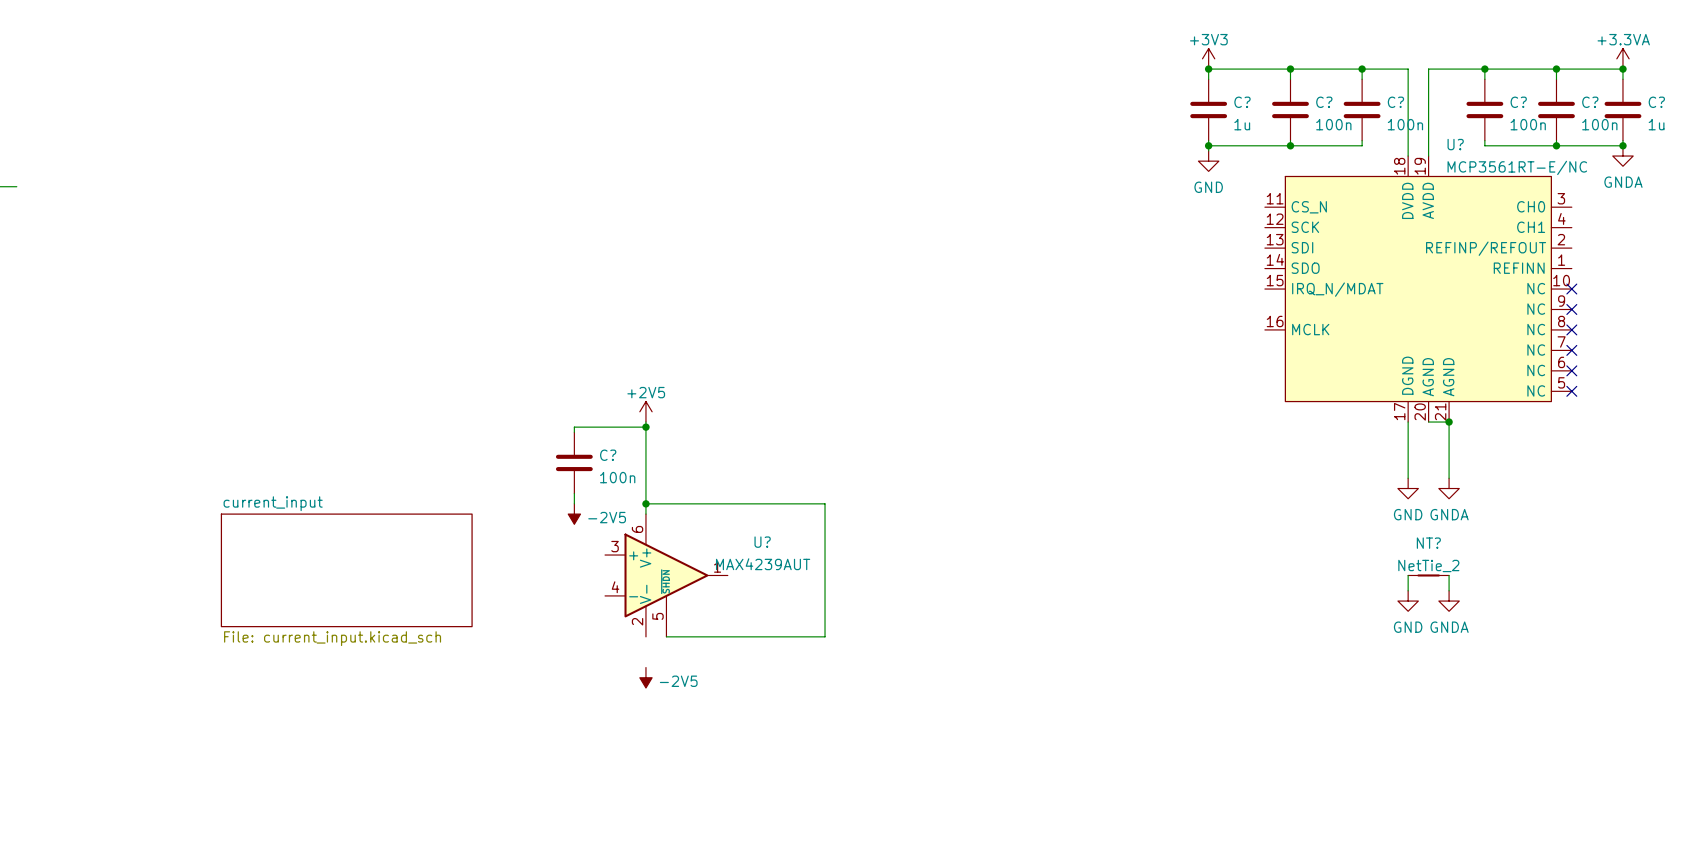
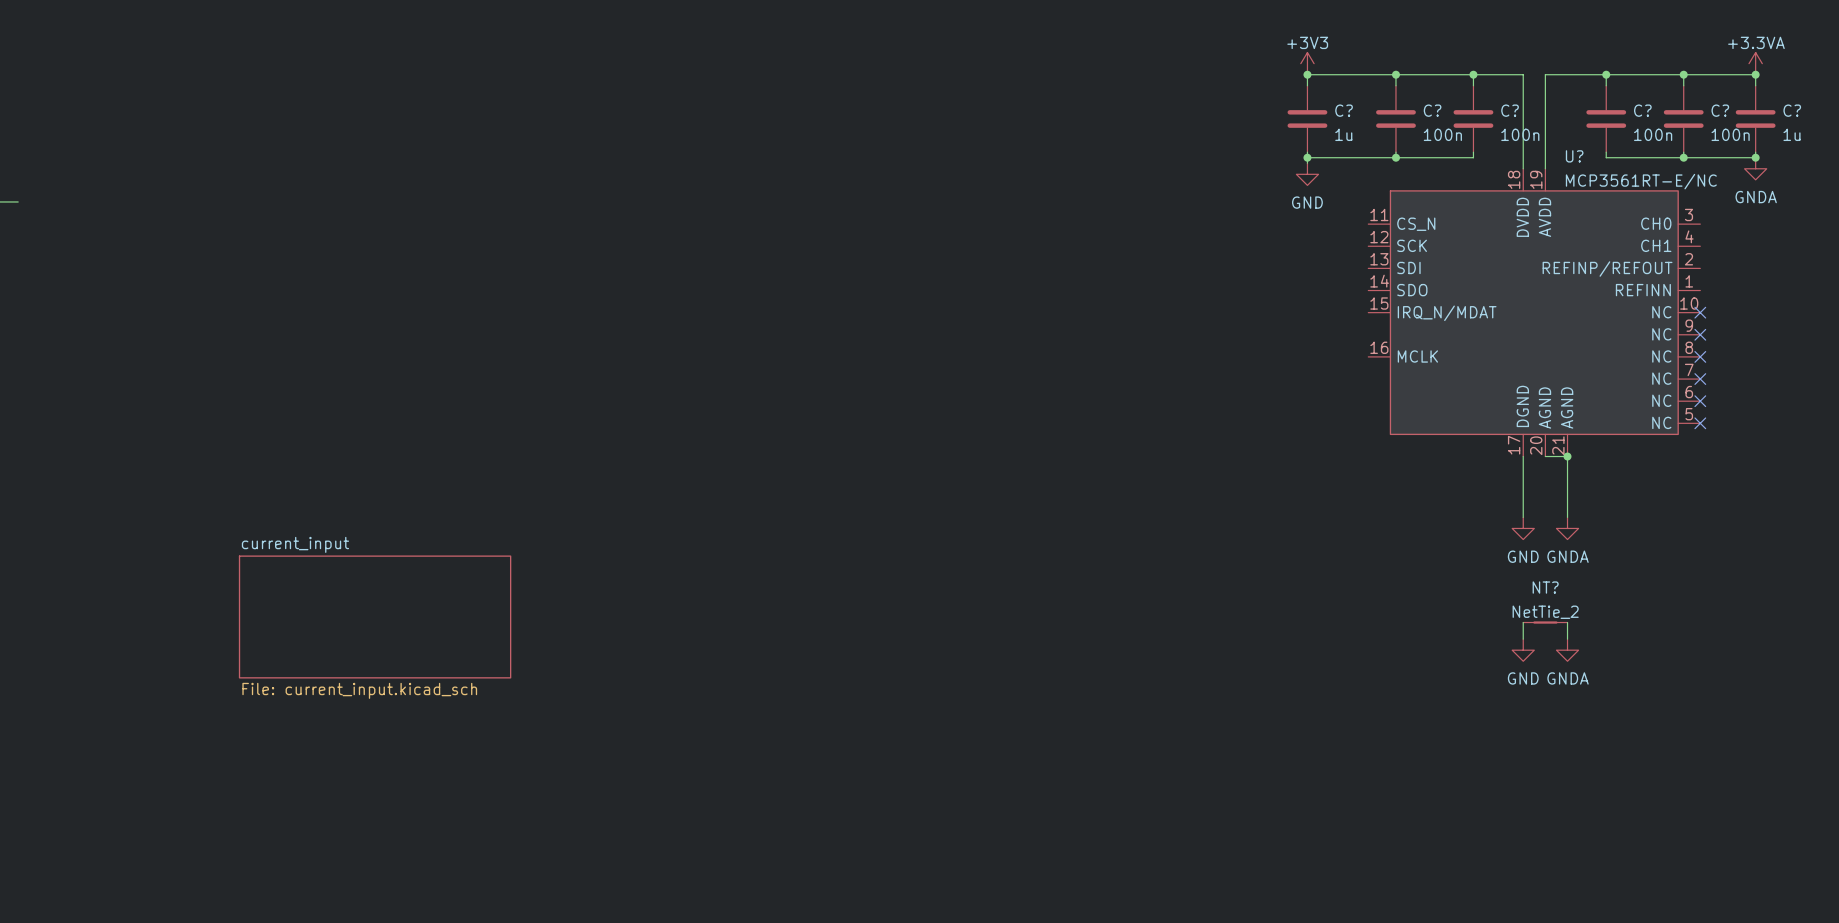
power symbol: +2V5 (645, 411) -> none
wire: (645, 422) (645, 514) -> none
wire: (645, 427) (574, 427) (574, 432) -> none
junction: (645, 427) -> none
C?: 100n (574, 462) -> none
wire: (574, 493) (574, 503) -> none
wire: (645, 503) (825, 503) (825, 636) (666, 636) -> none
junction: (645, 503) -> none
power symbol: -2V5 (574, 514) -> none
U?: MAX4239AUT (666, 575) -> none
power symbol: -2V5 (645, 677) -> none

